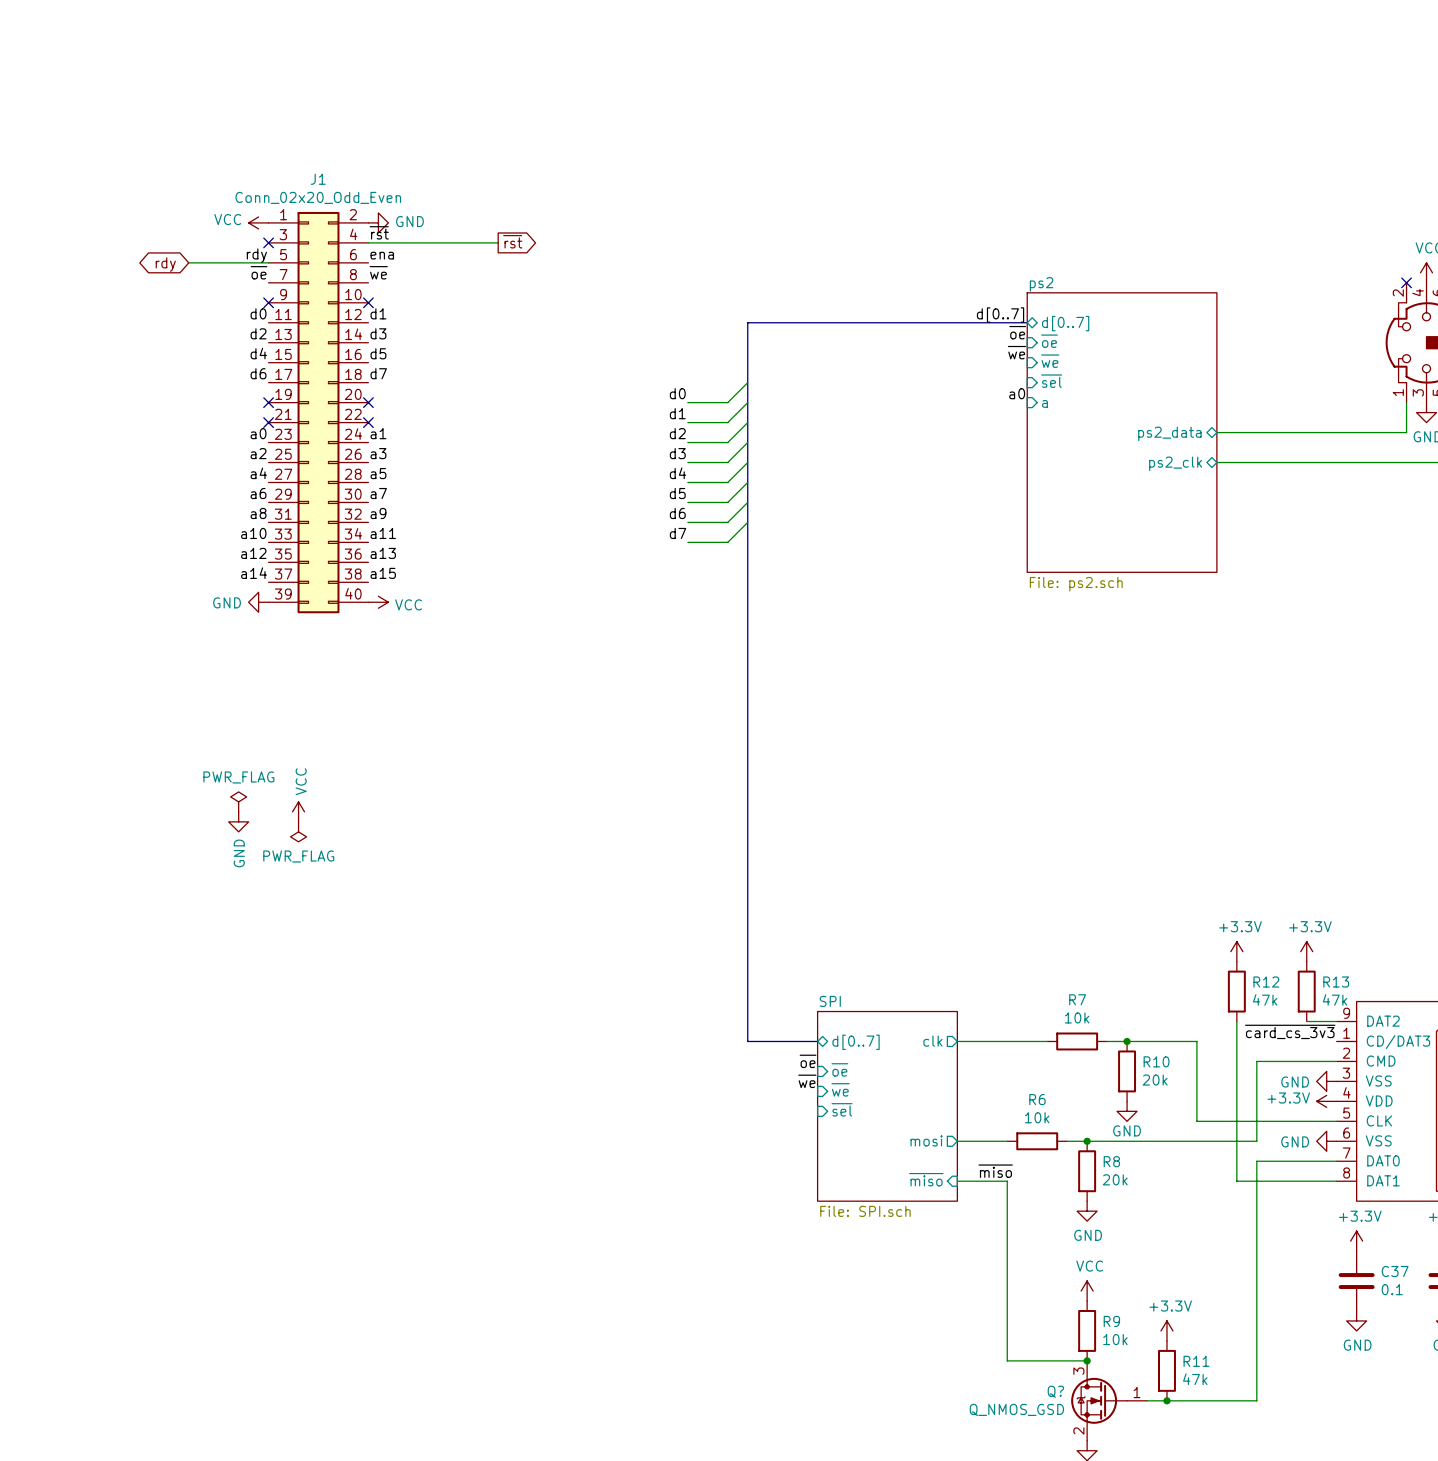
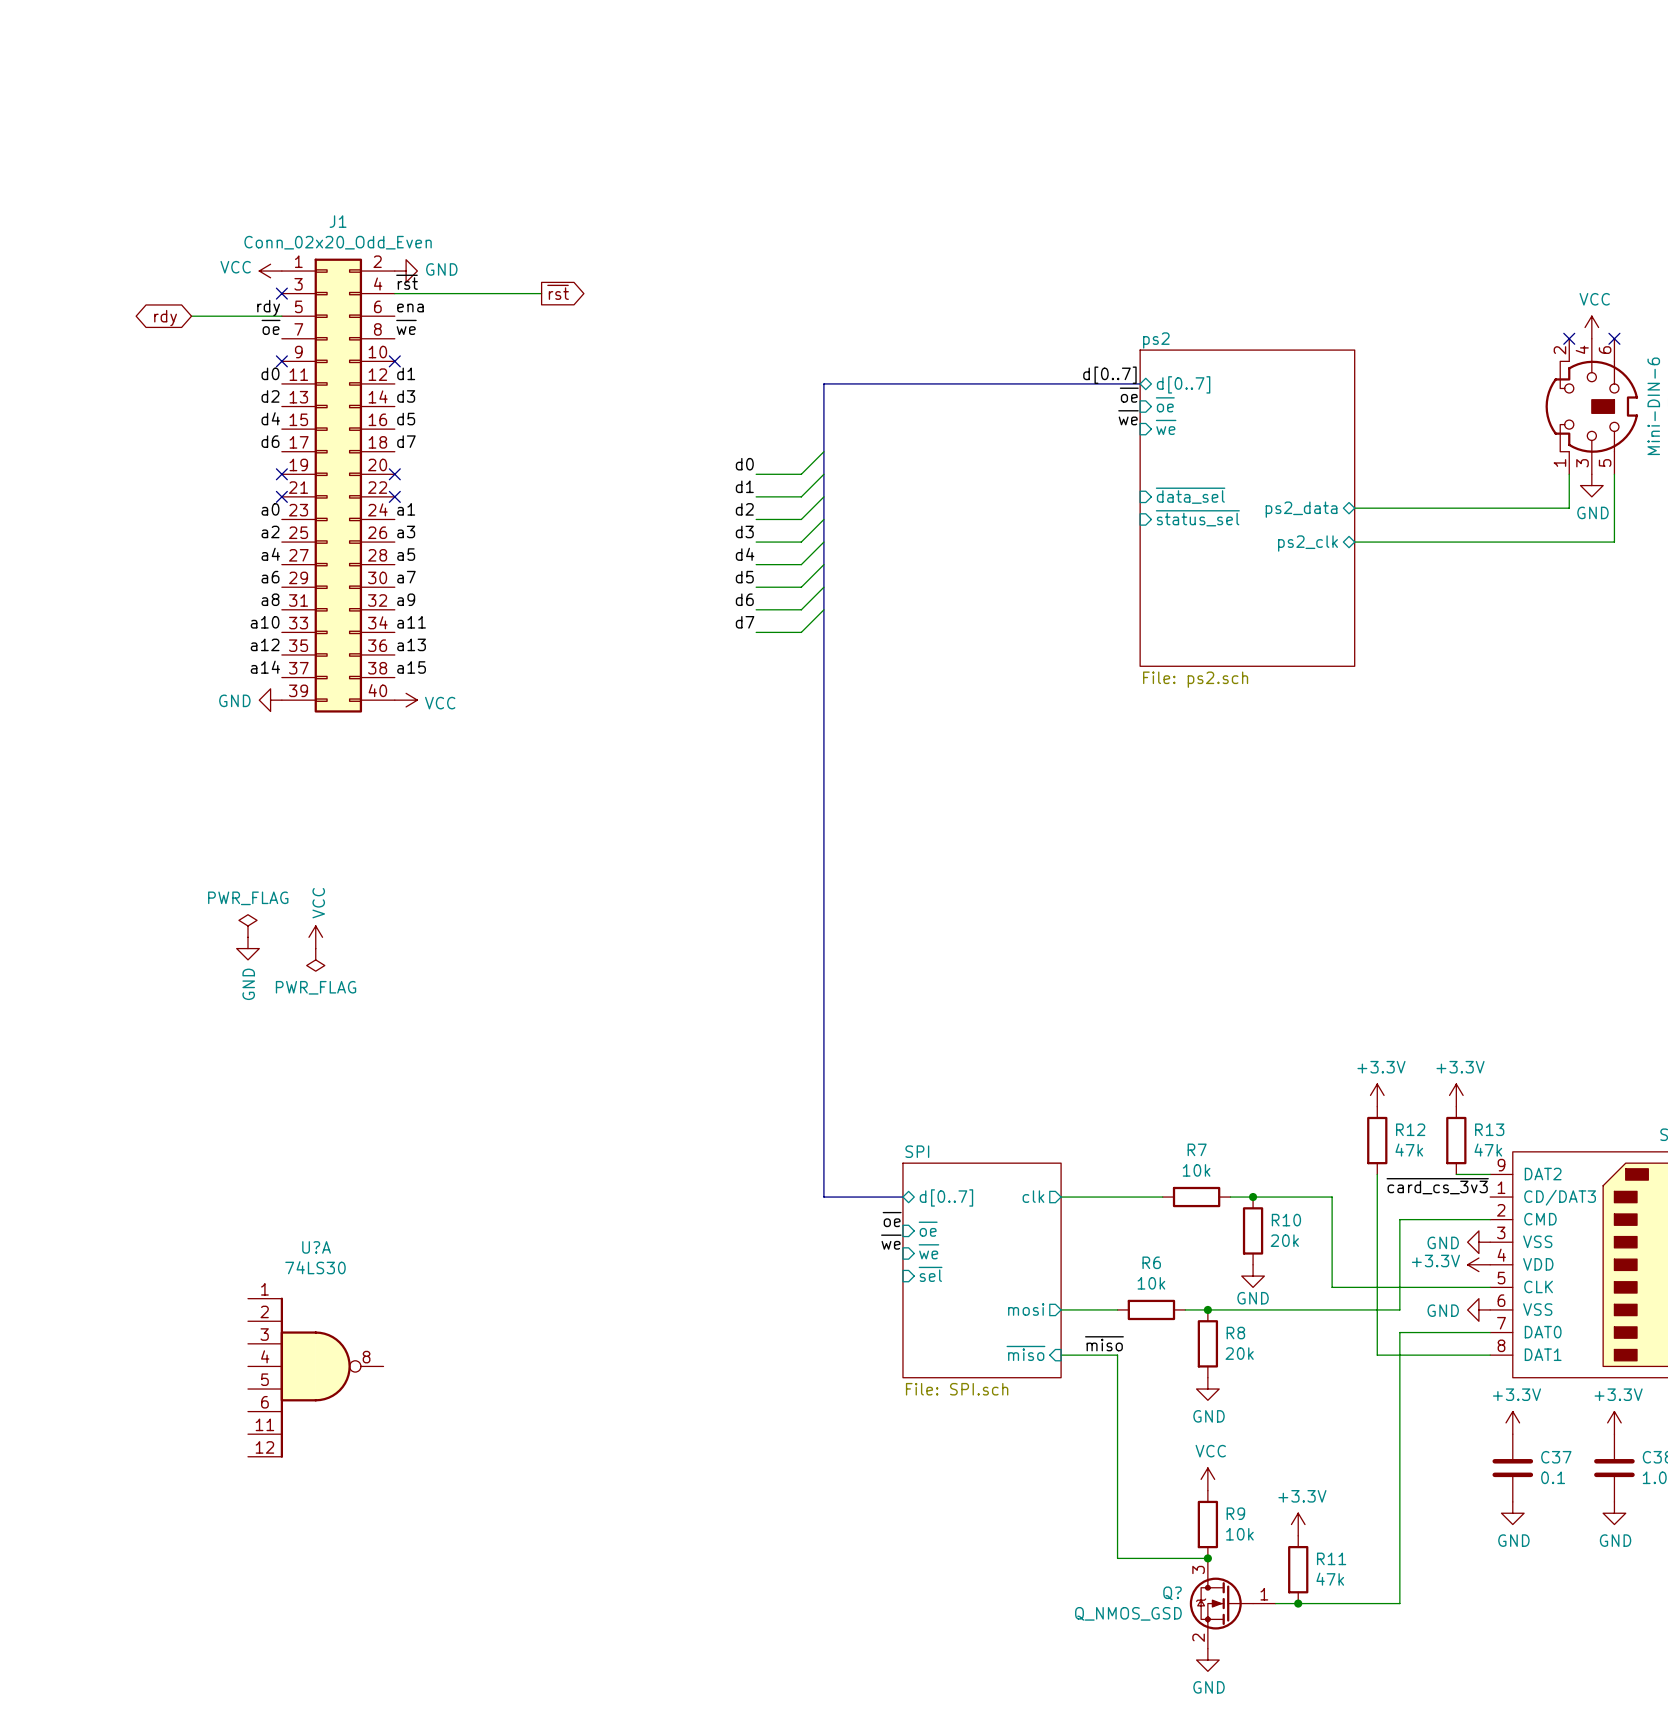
sheet pin: ~{sel} (1051, 381) -> none
label: a0 (1017, 393) -> none
sheet pin: a (1044, 403) -> none
sheet pin: none -> ~{data_sel} (1190, 495)
sheet pin: none -> ~{status_sel} (1197, 518)
U?A: none -> 74LS30 (315, 1377)

